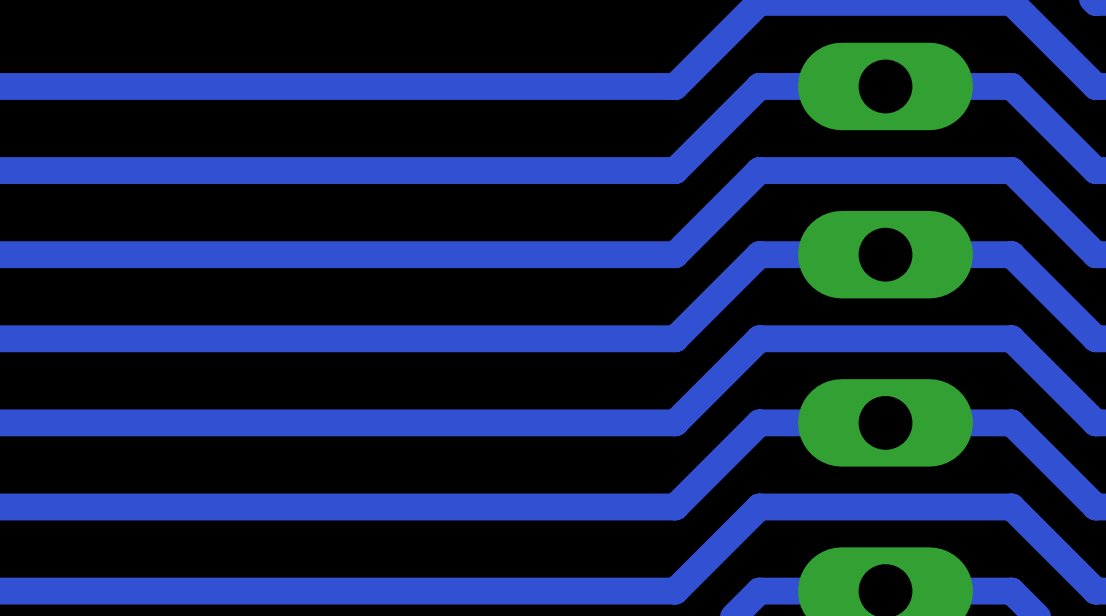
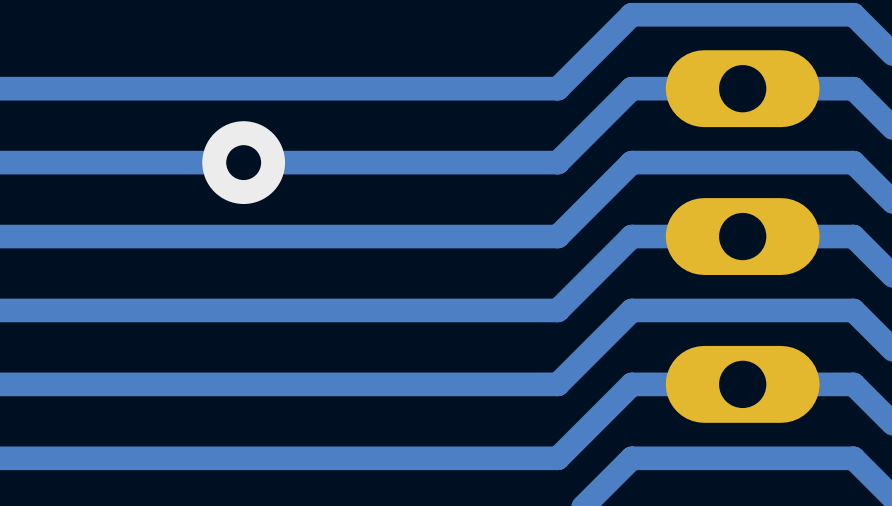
via: none -> (243, 162)

